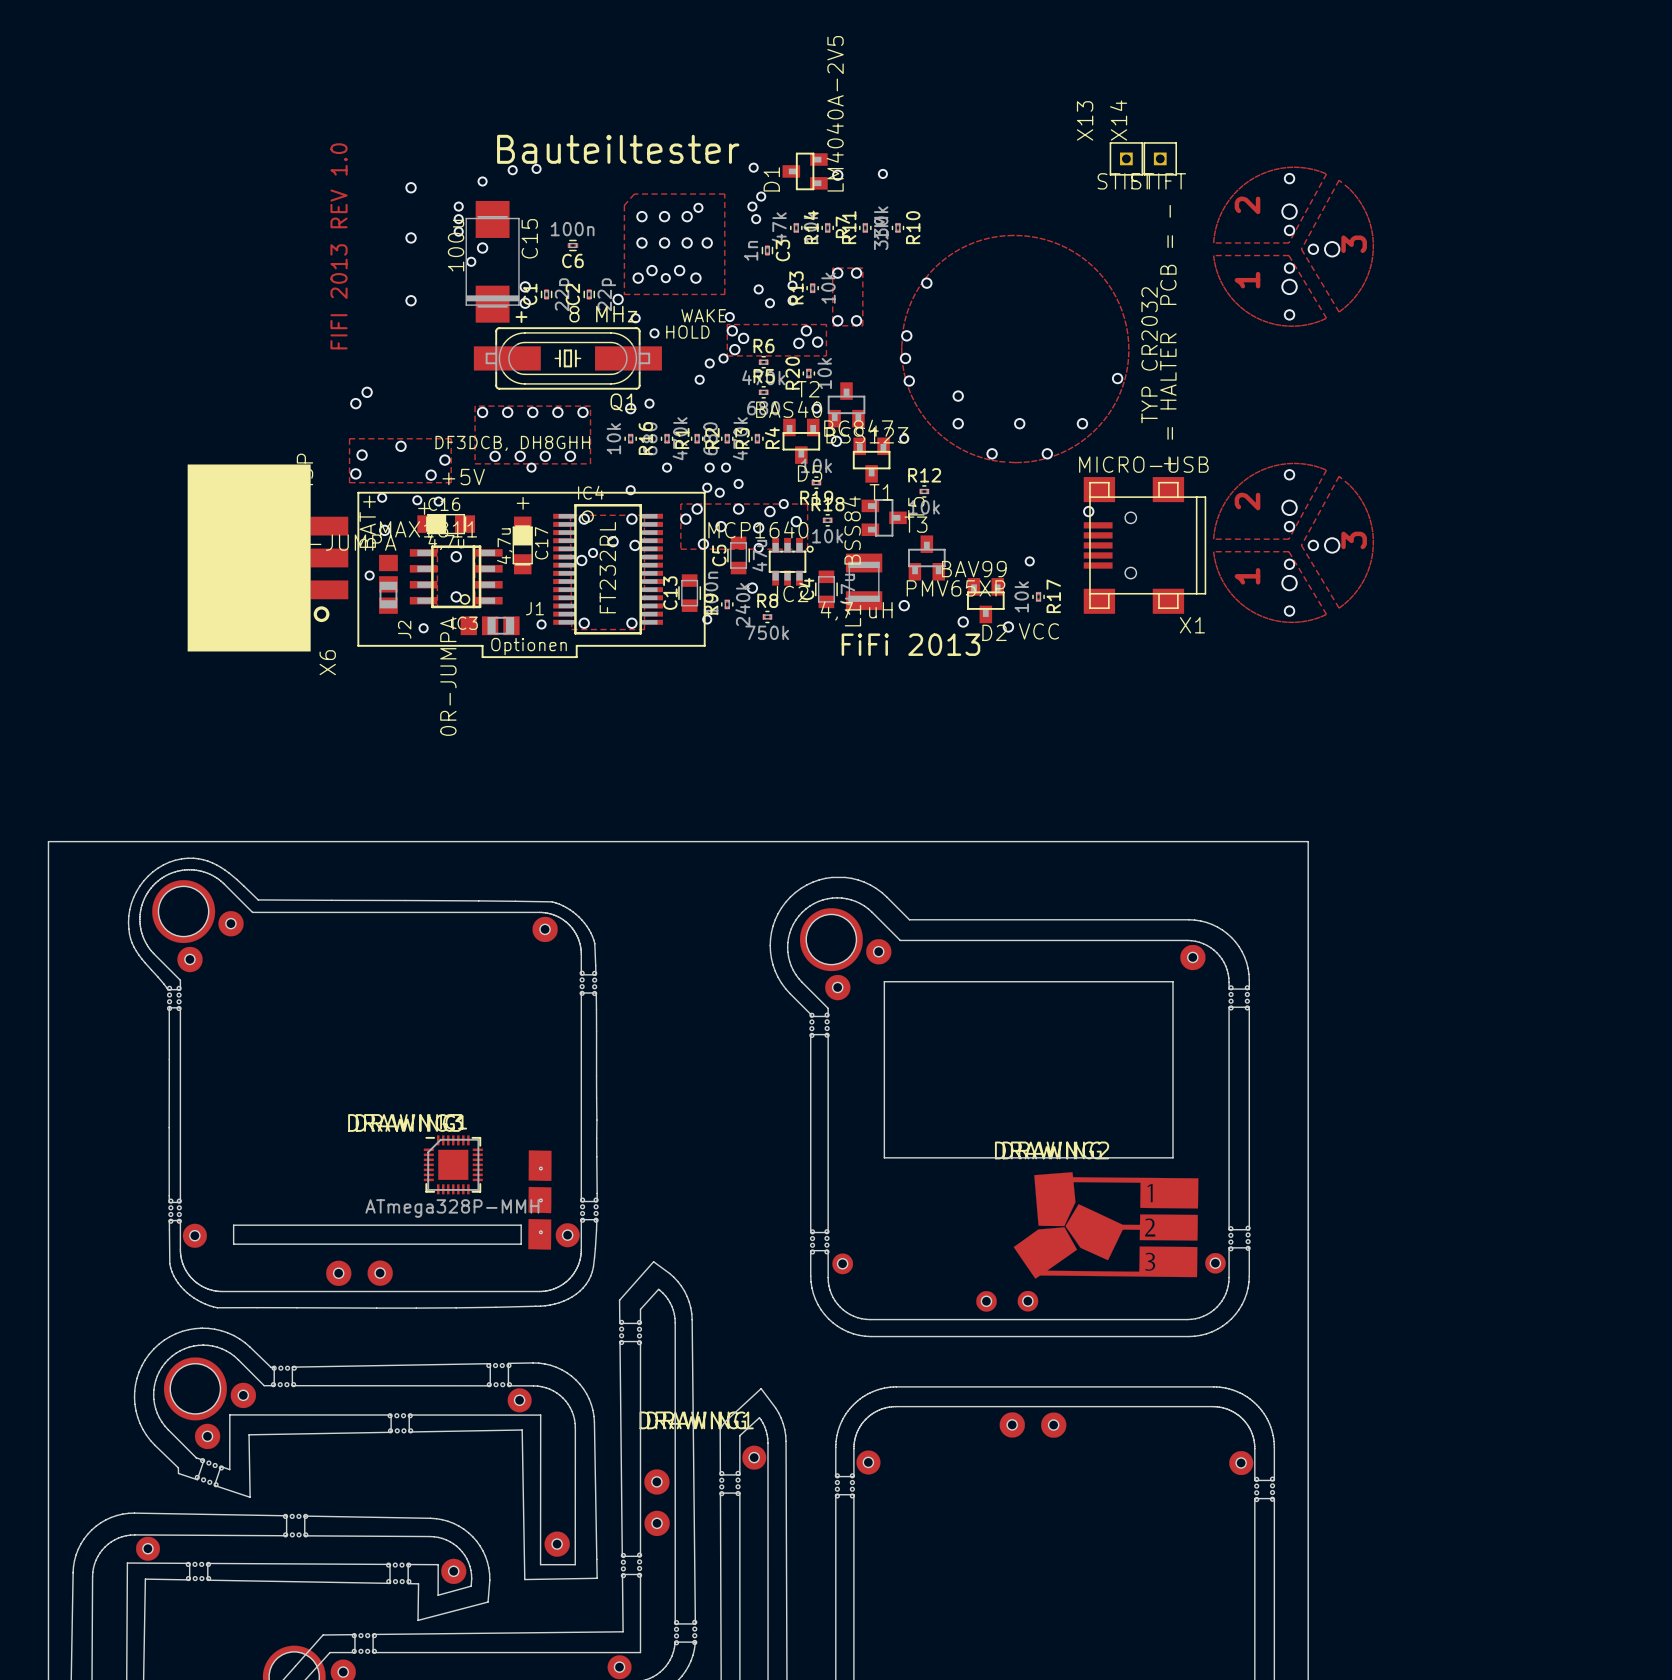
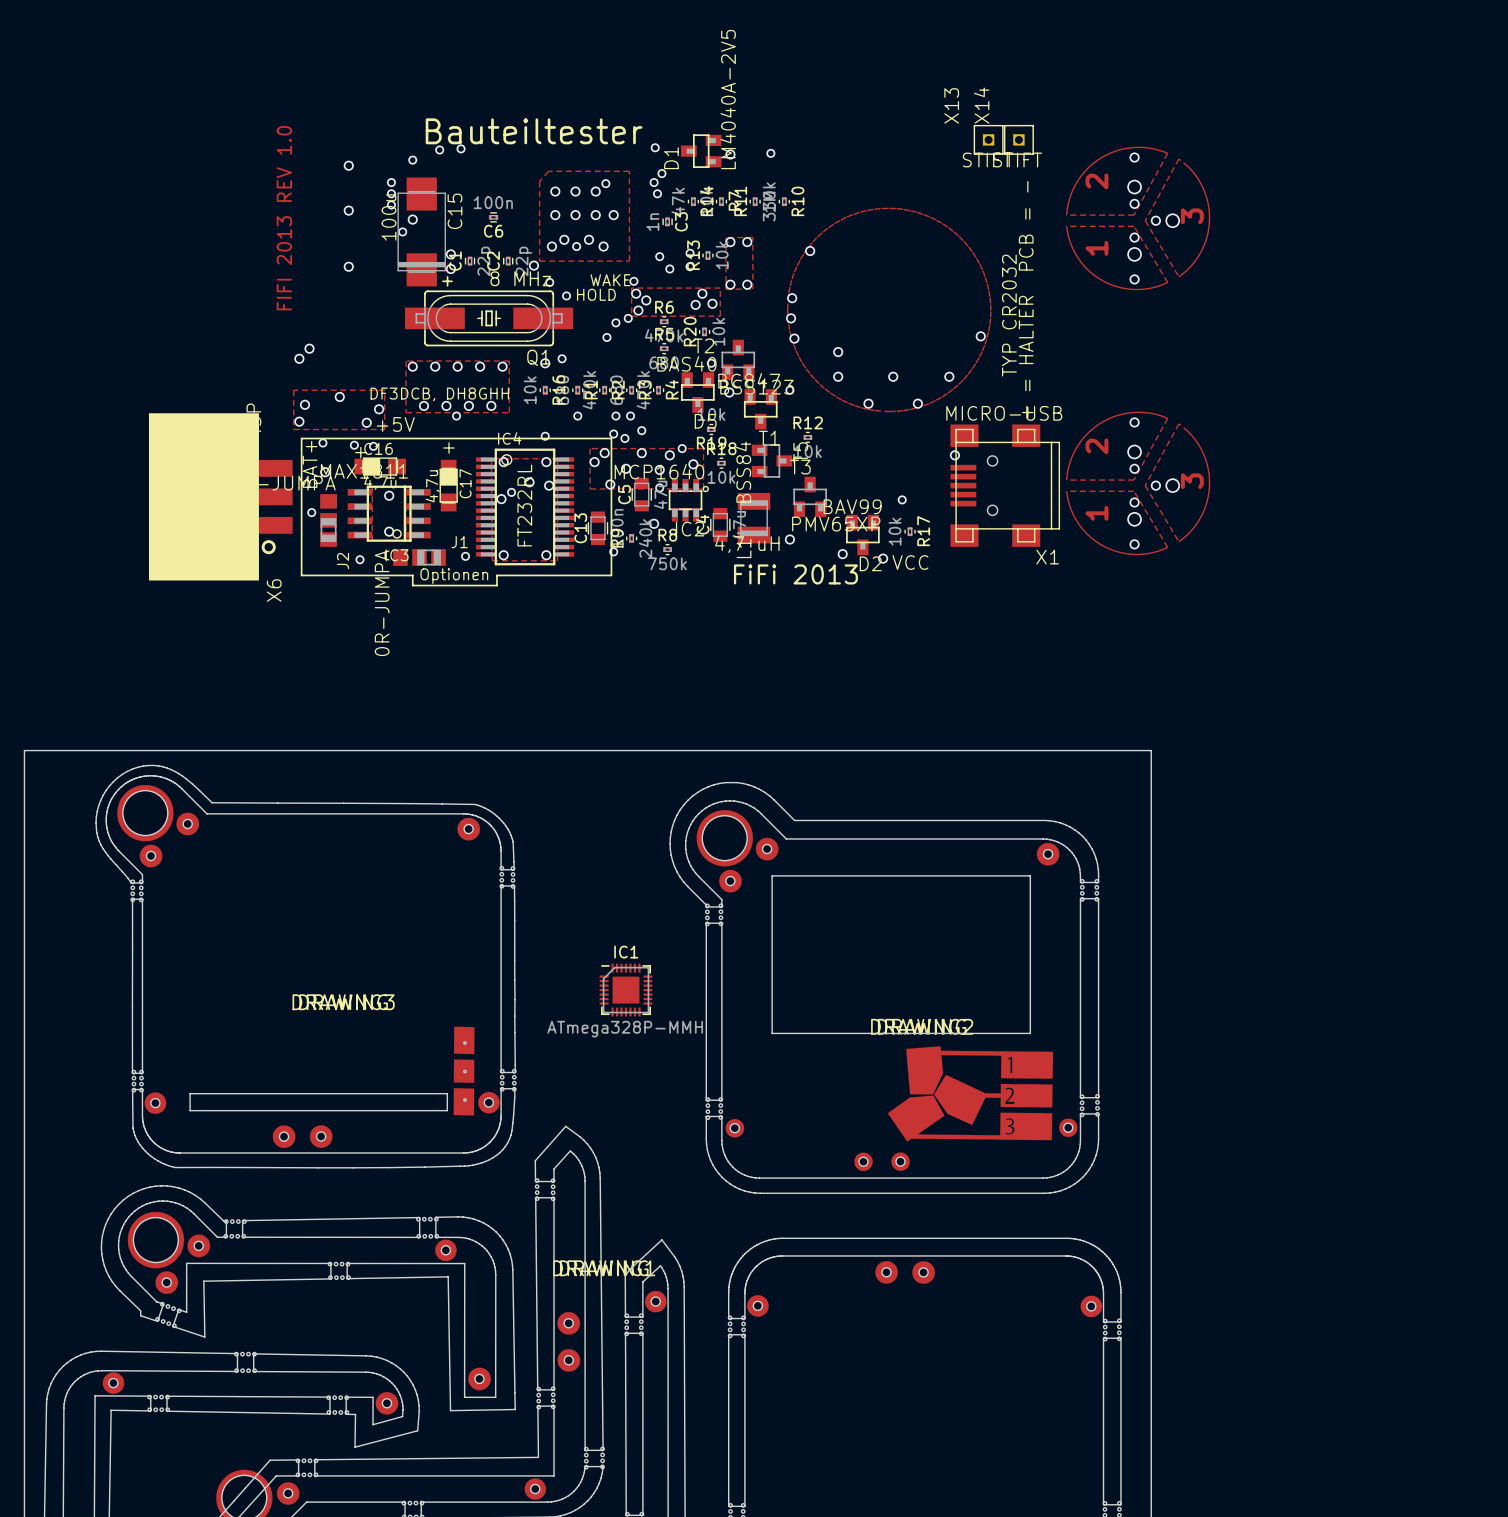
IC1 position: (453, 1164) -> (626, 990)

